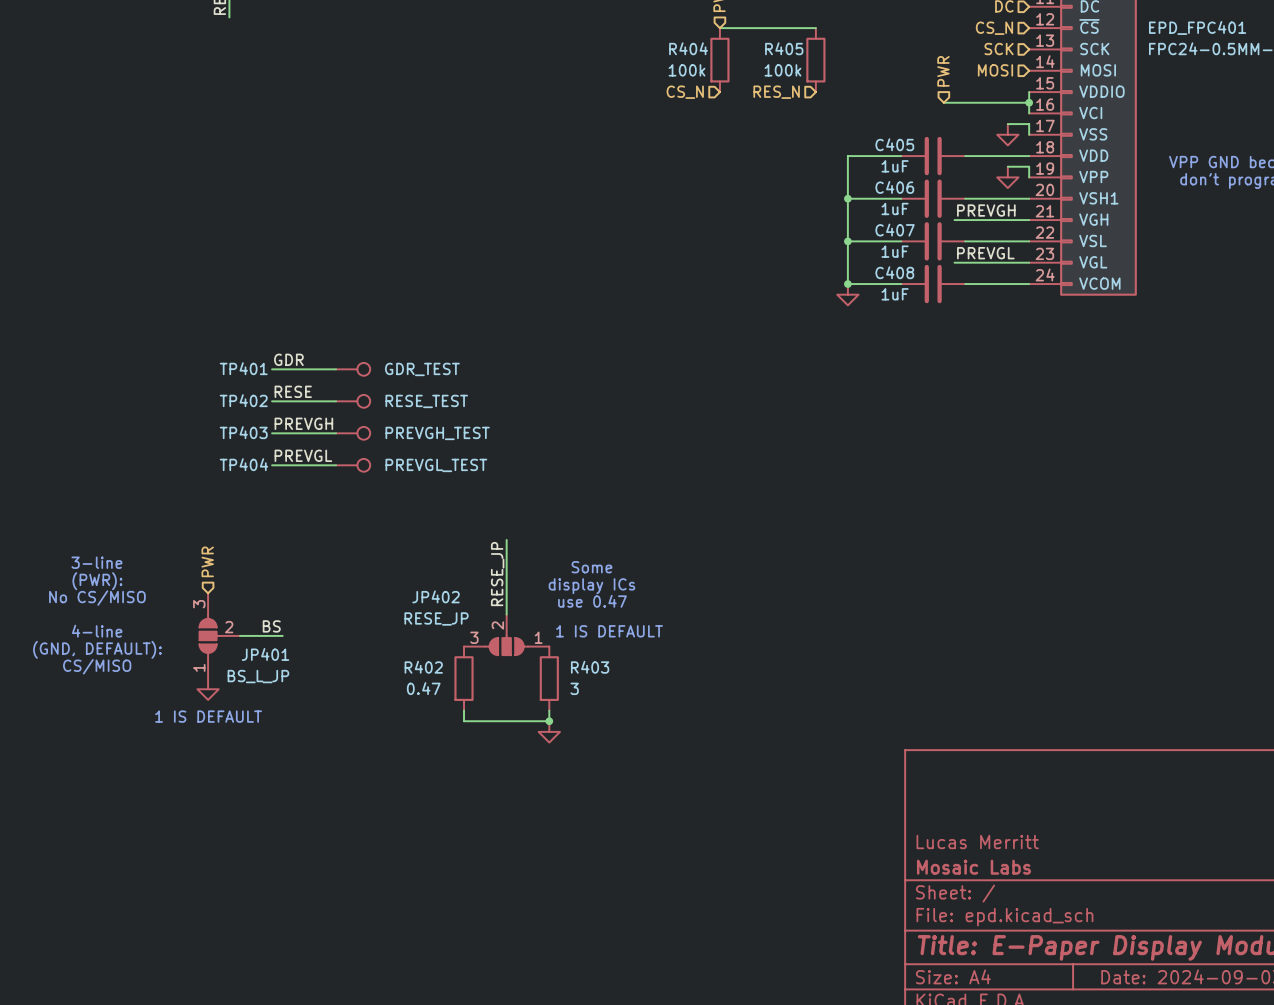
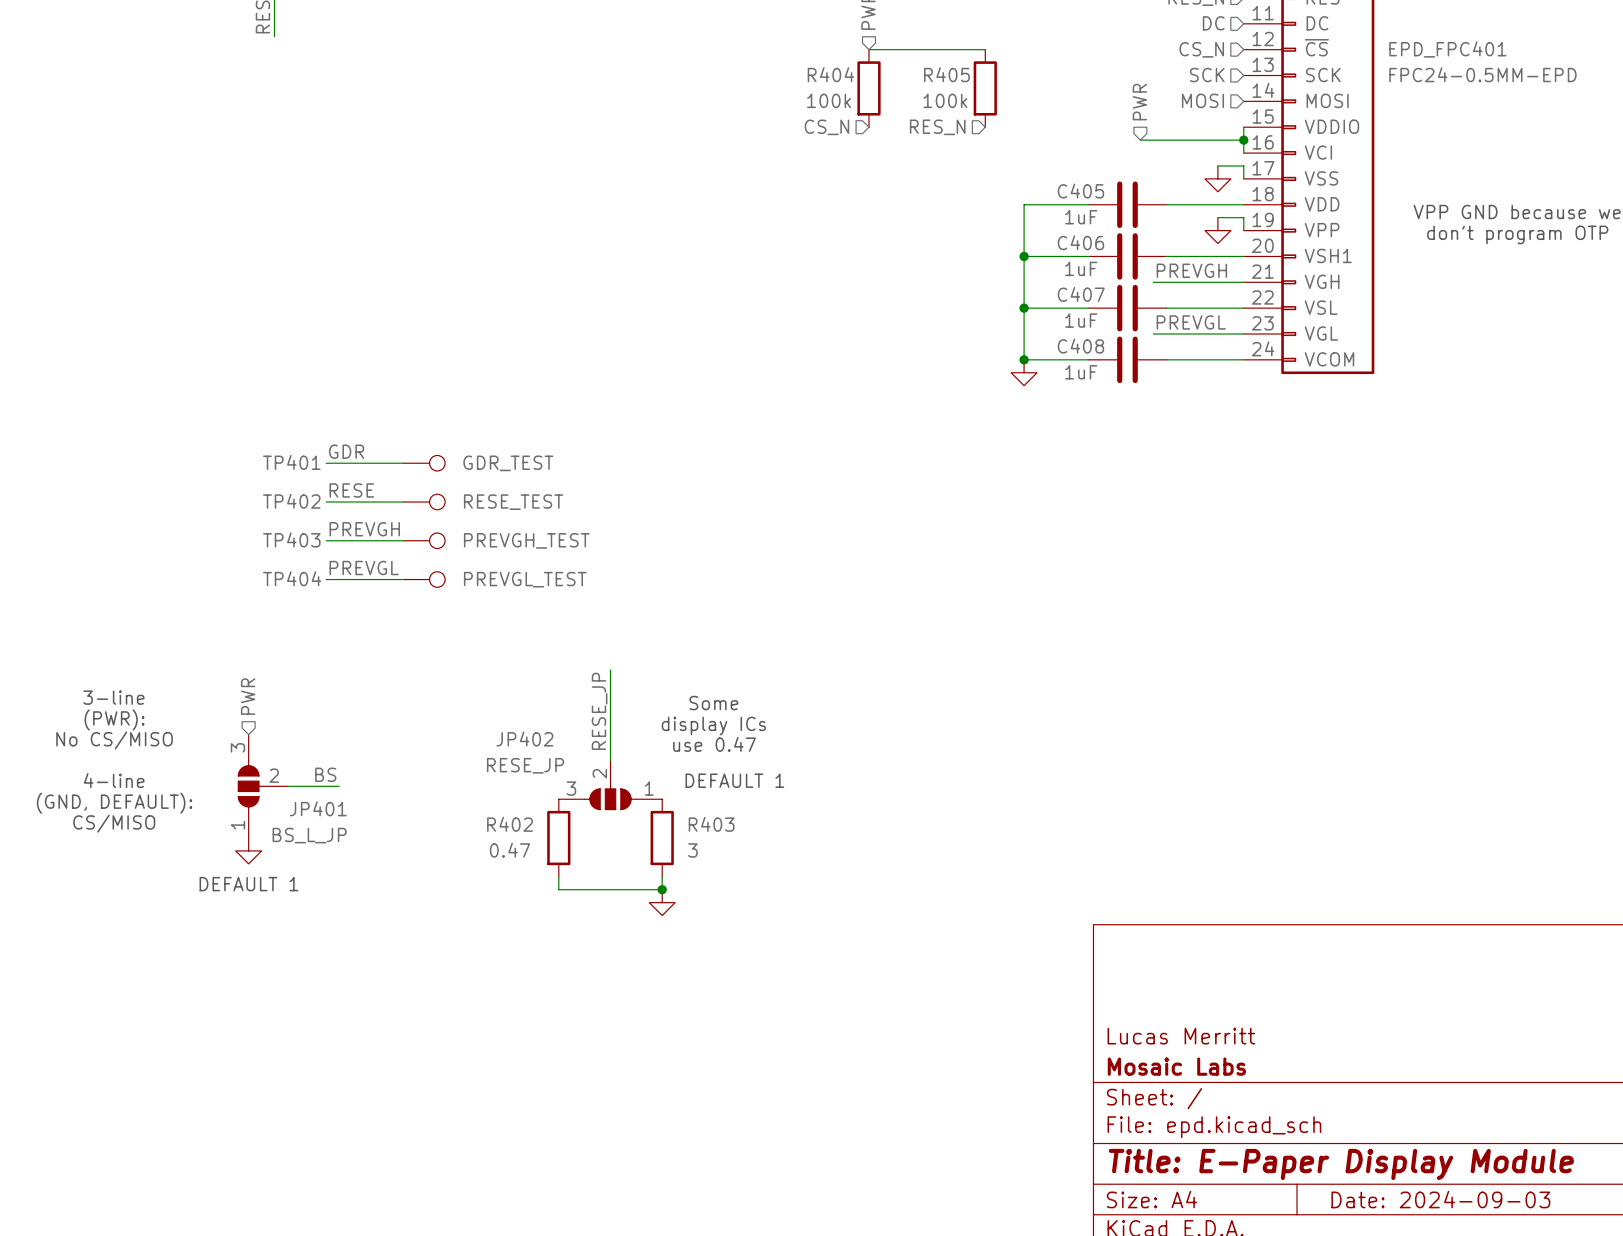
text: 1 IS DEFAULT (609, 631) -> DEFAULT 1 (734, 780)
text: 1 IS DEFAULT (208, 716) -> DEFAULT 1 (248, 884)

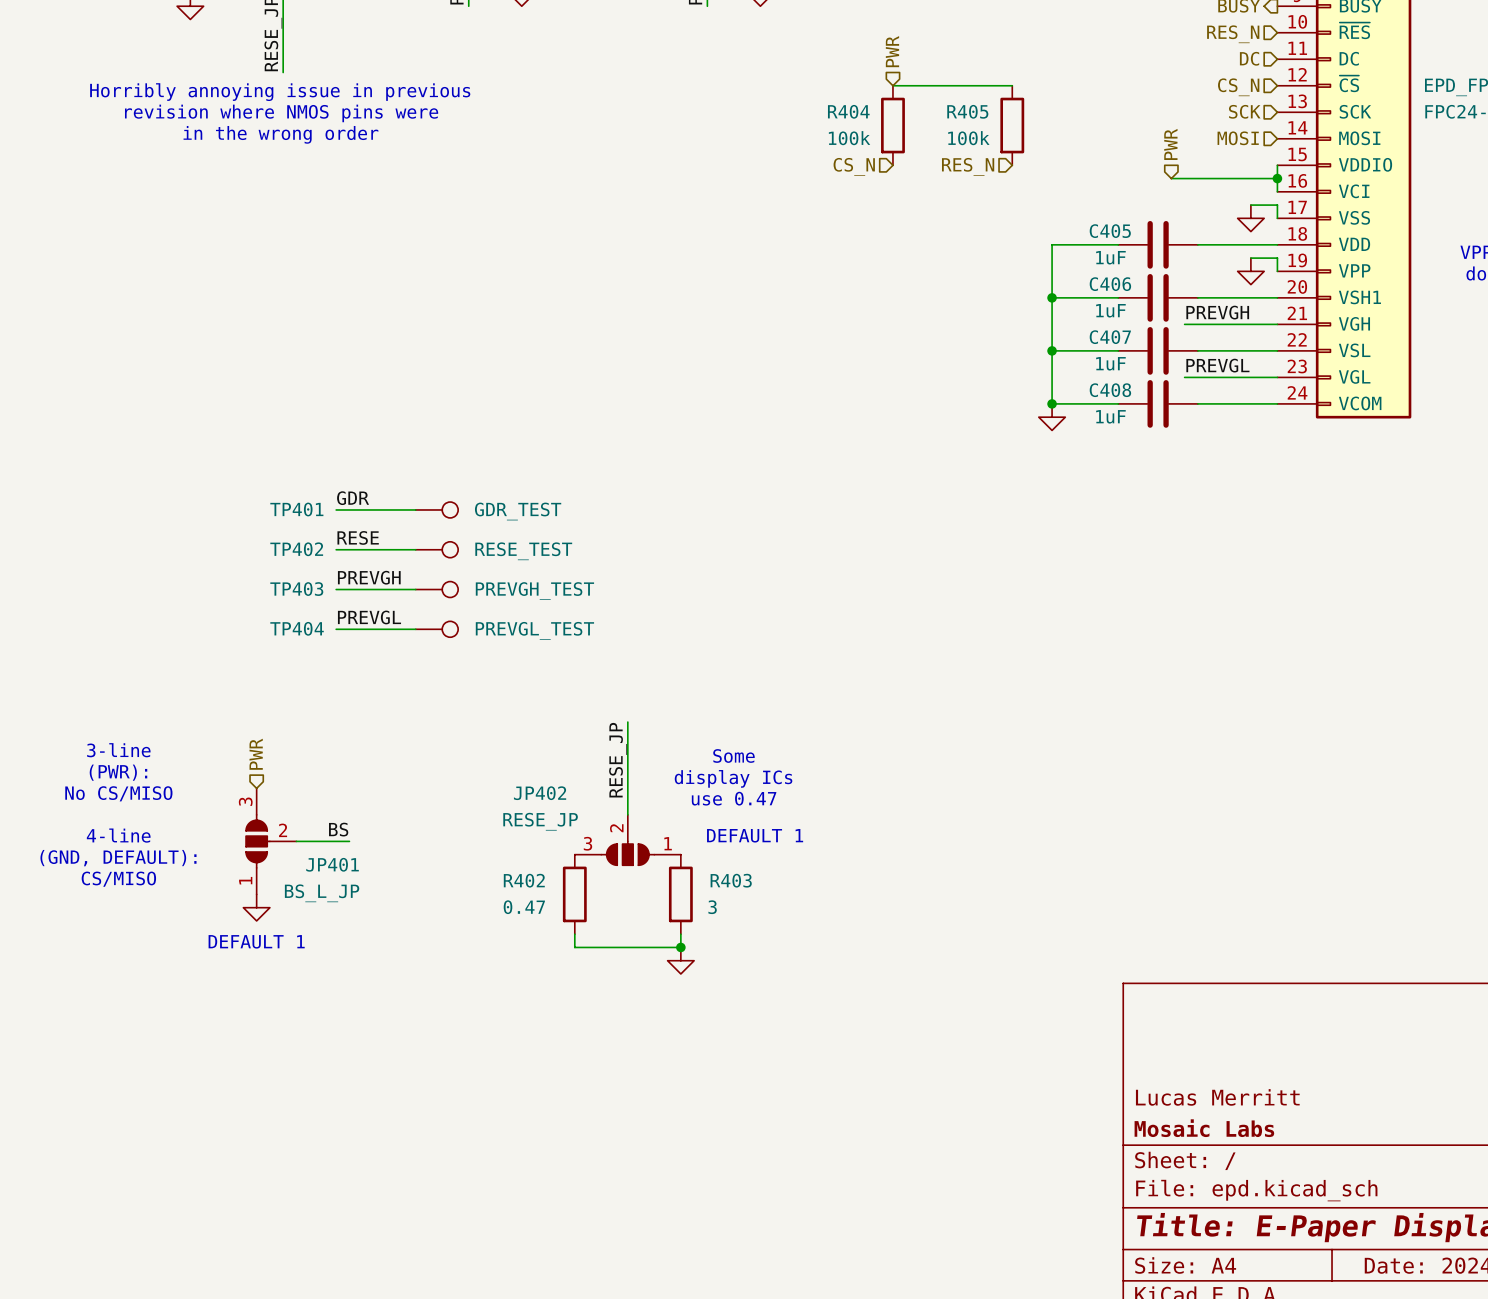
text: none -> Horribly annoying issue in previous (280, 92)
text: none -> revision where NMOS pins were (281, 113)
text: none -> in the wrong order (280, 134)

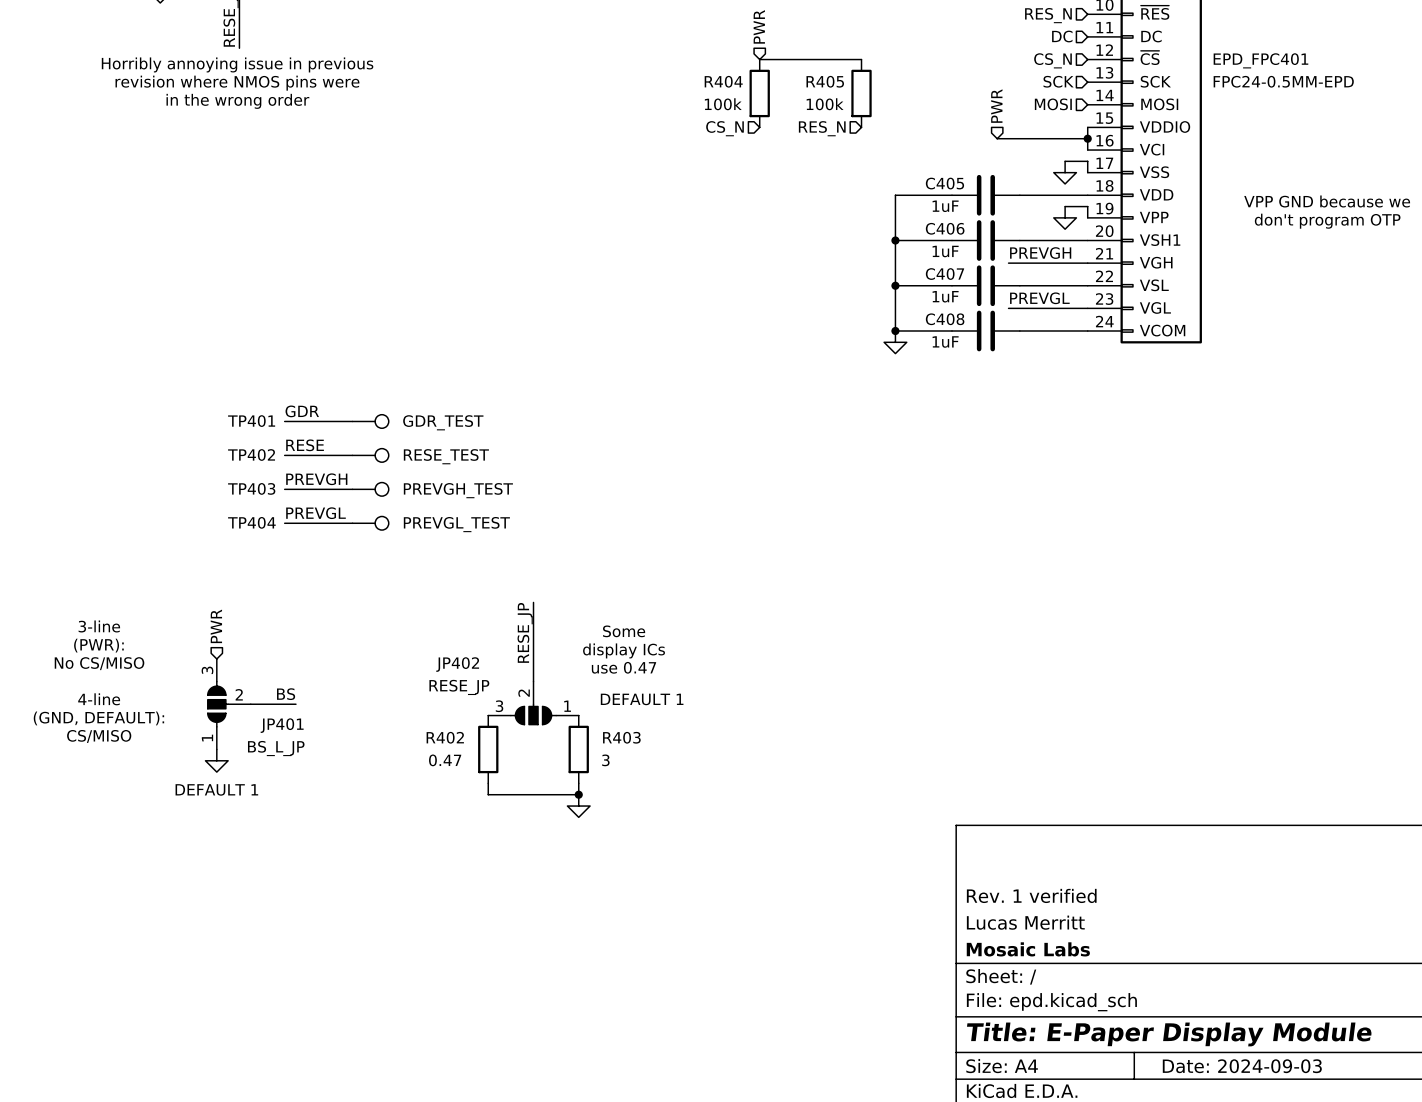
title block: none -> Rev. 1 verified (1031, 895)

